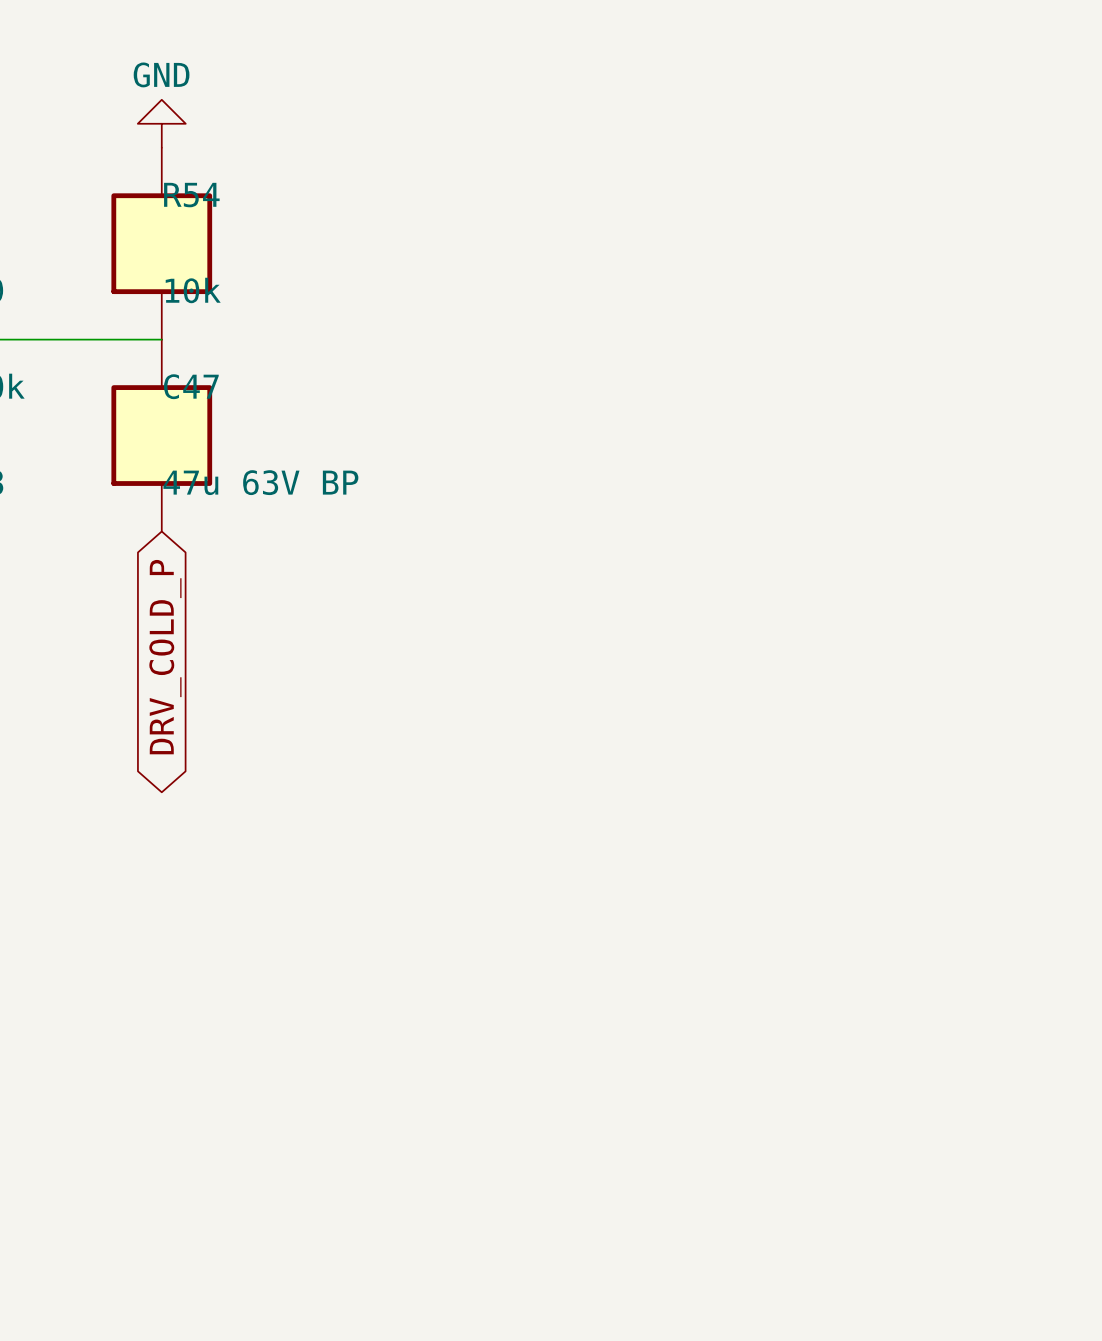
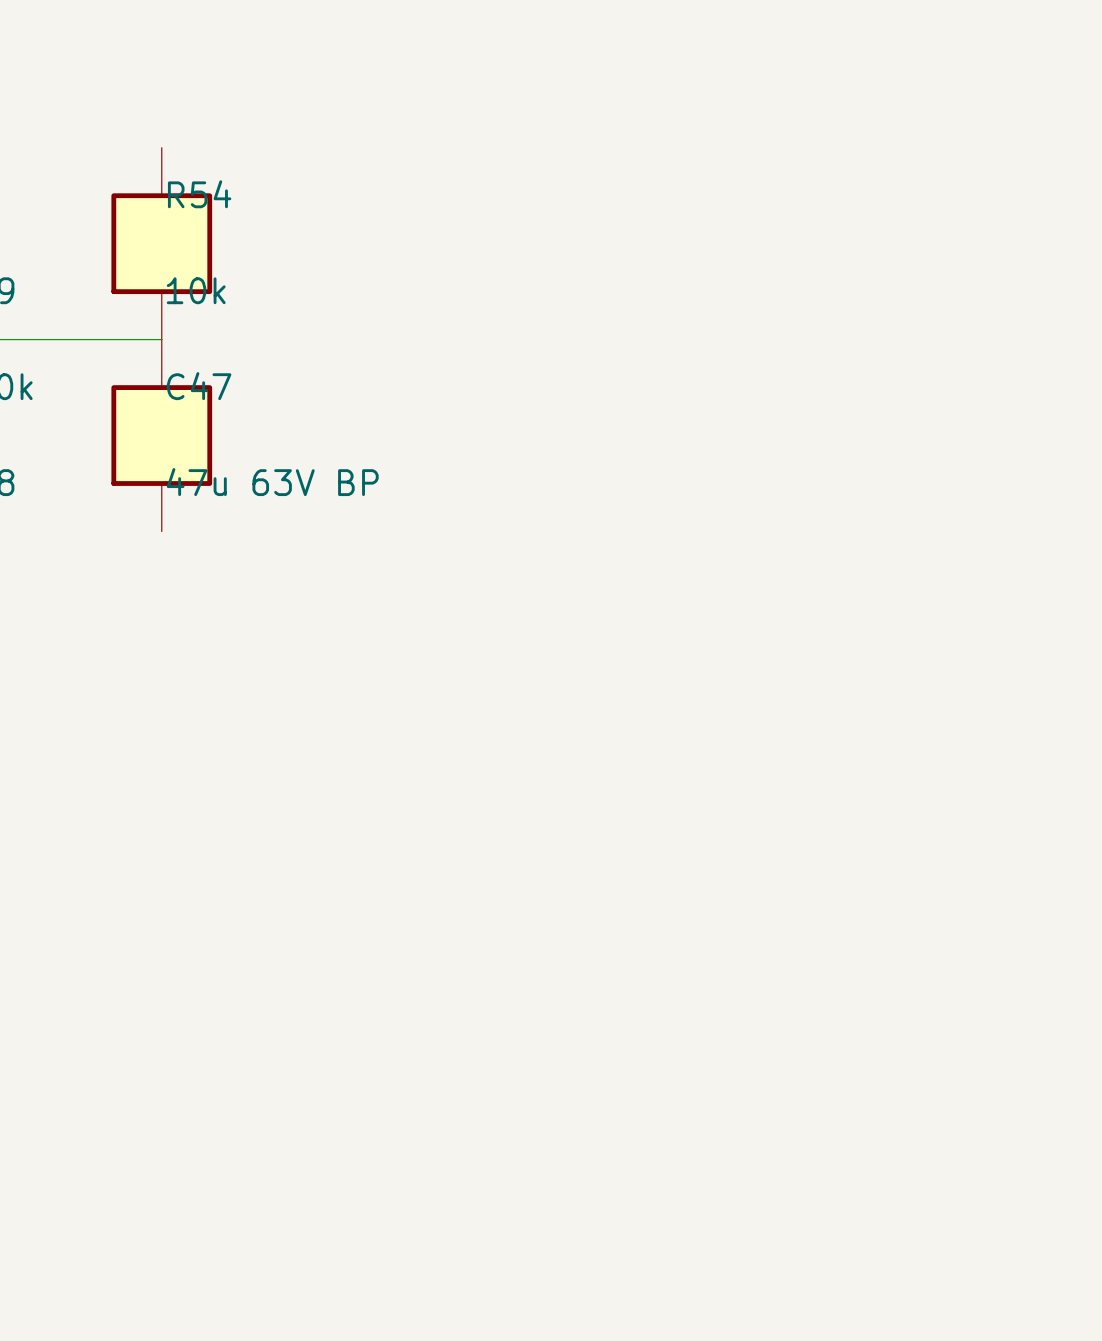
power symbol: GND (161, 123) -> none
global label: DRV_COLD_P (165, 657) -> none

